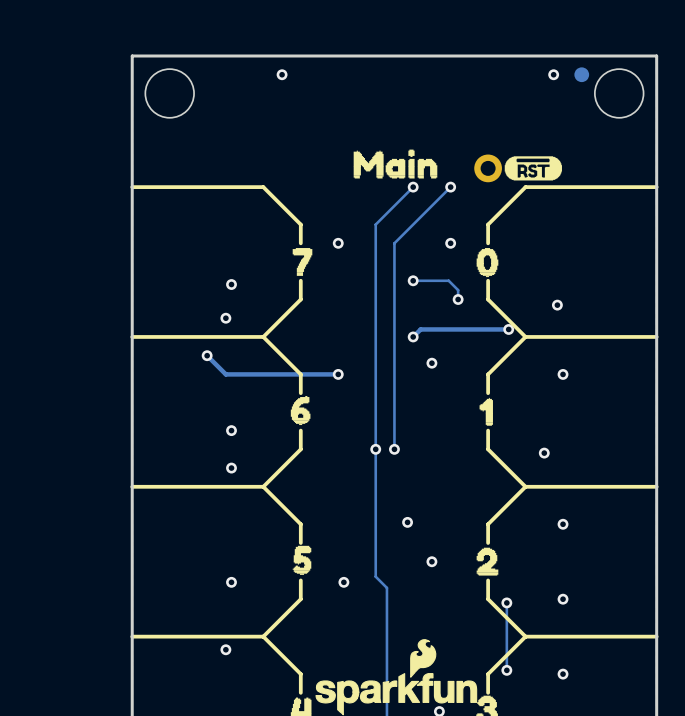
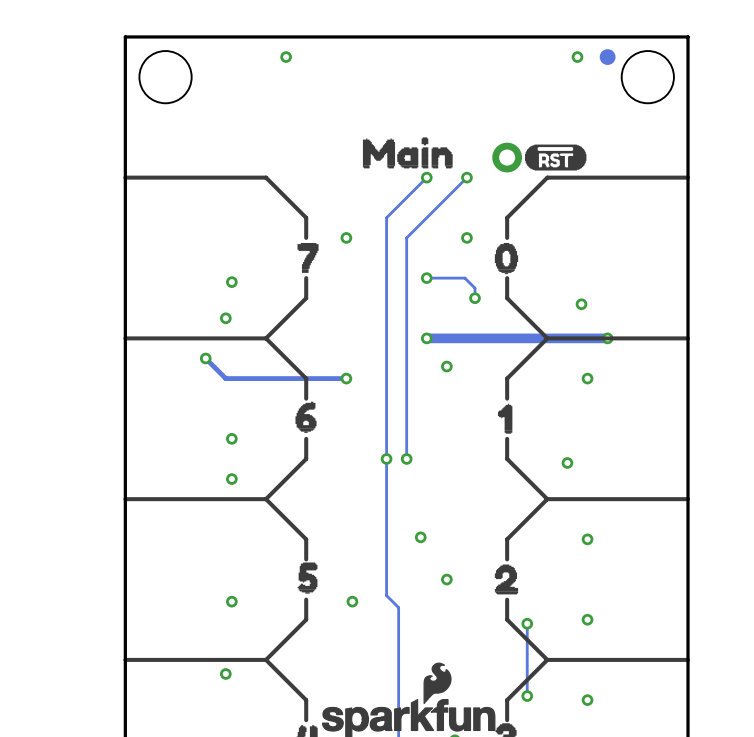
track: (508, 329) (420, 329) (413, 336) -> (607, 338) (426, 338)
via position: (508, 329) -> (607, 338)

